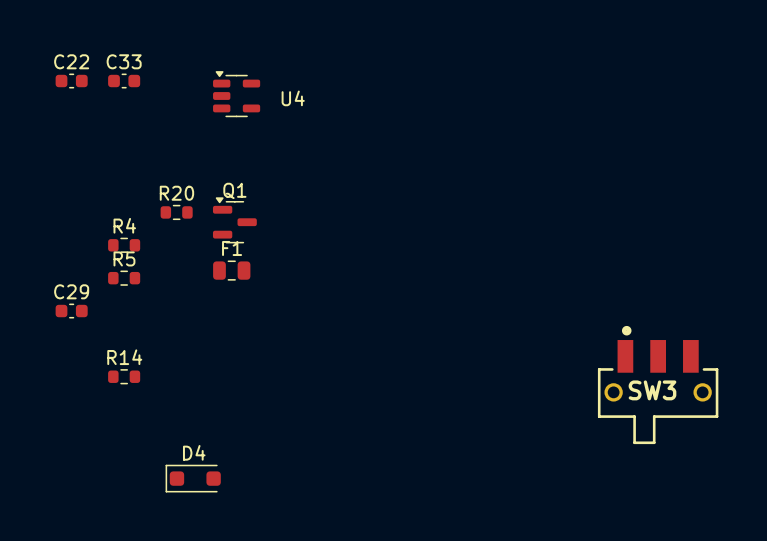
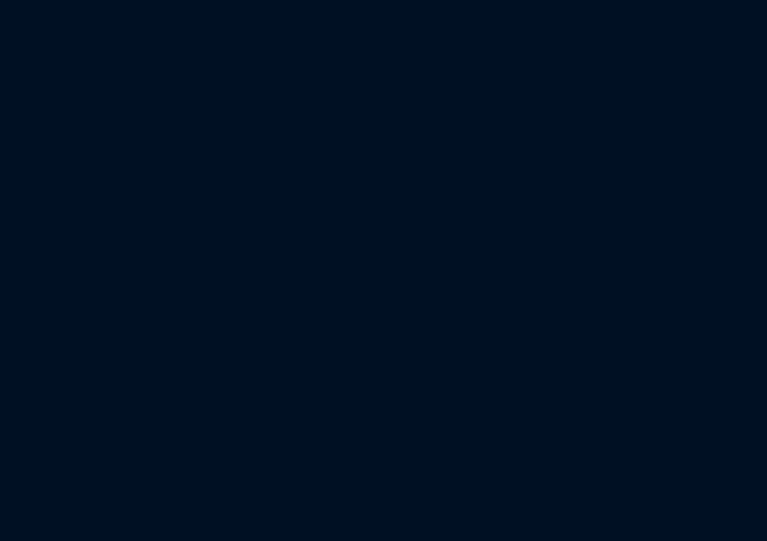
C22: (71, 81) -> none
C33: (124, 81) -> none
U4: (236, 94) -> none
R20: (176, 212) -> none
Q1: (234, 220) -> none
R4: (124, 245) -> none
F1: (231, 270) -> none
R5: (124, 278) -> none
C29: (71, 311) -> none
R14: (124, 376) -> none
SW3: (658, 385) -> none
D4: (193, 478) -> none

